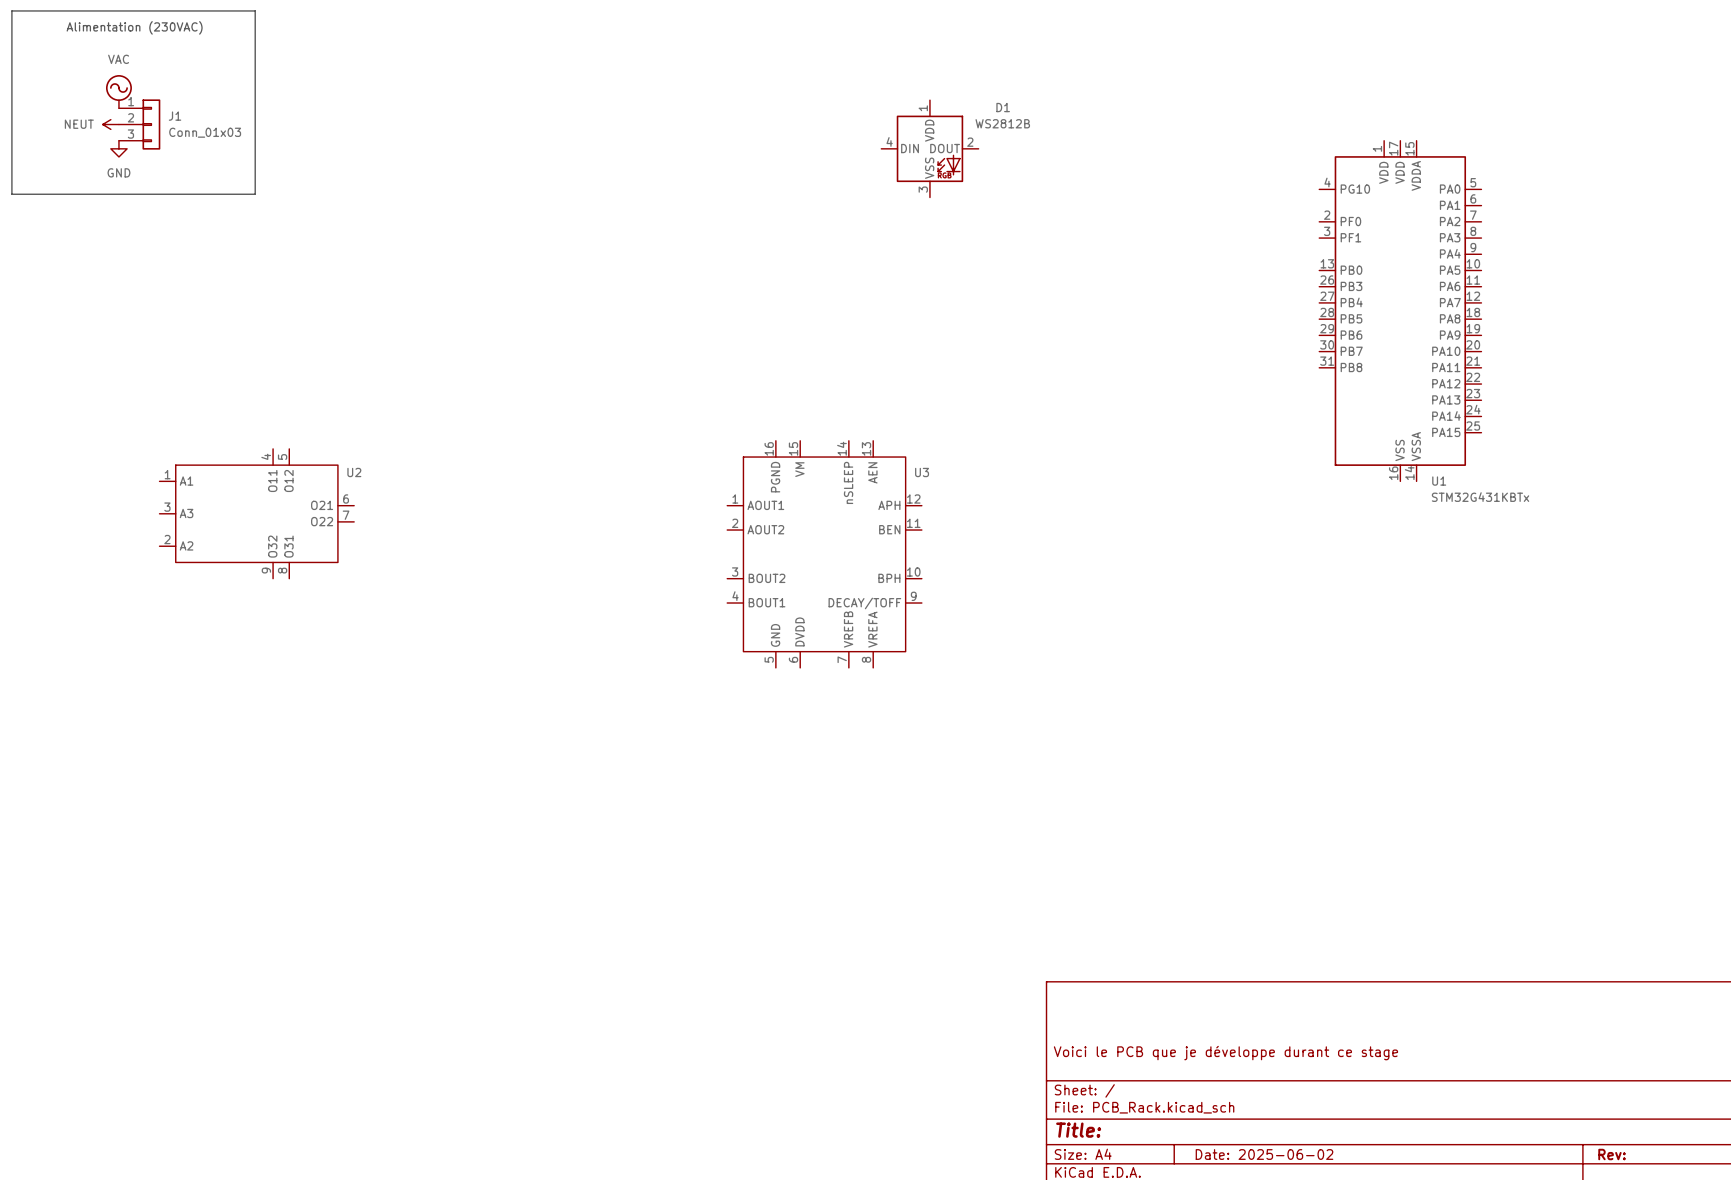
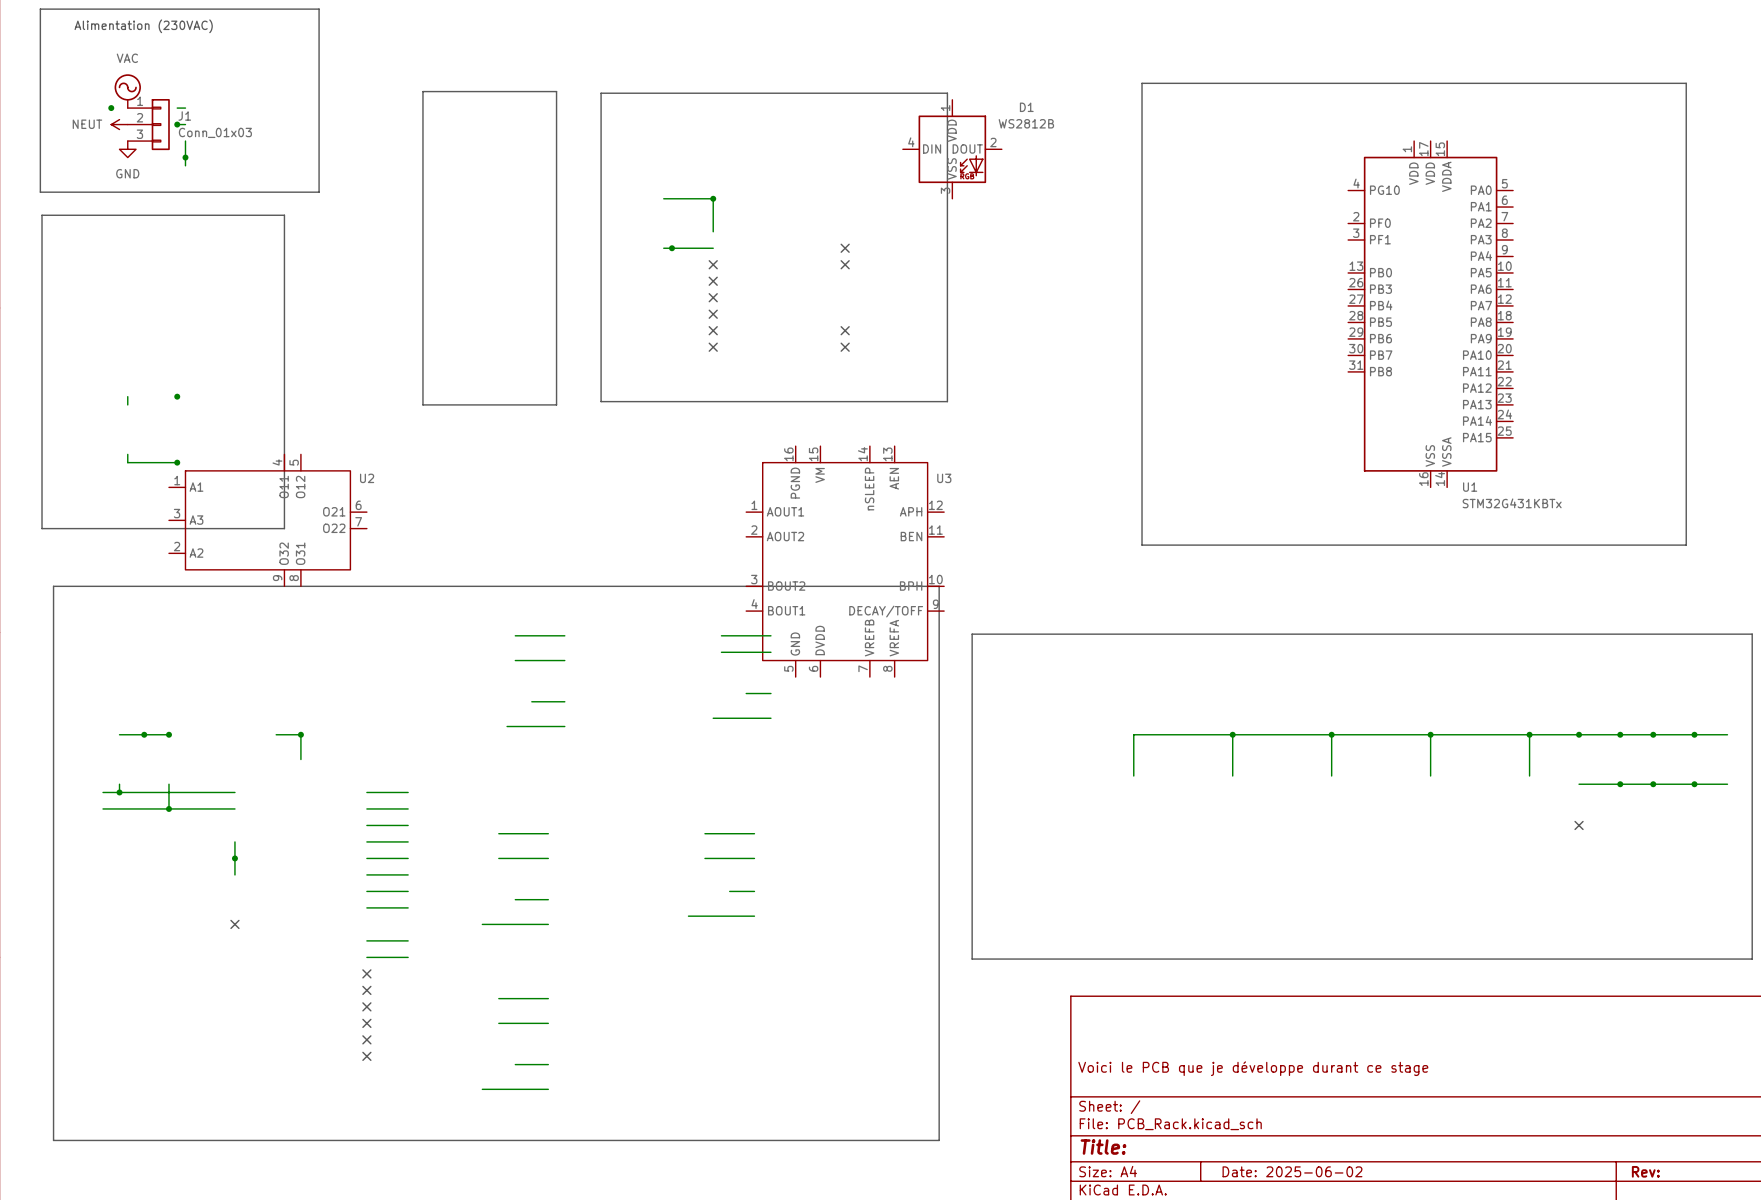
line: (33, 10) (11, 10) (11, 194) (255, 194) (255, 10) -> (40, 9) (40, 192) (319, 192) (319, 9) (266, 9)
line: none -> (1142, 83) (1686, 83) (1686, 545) (1142, 545) (1142, 83)
line: none -> (422, 91) (556, 91) (556, 404) (422, 404) (422, 91)
line: none -> (601, 93) (947, 93) (947, 401) (601, 401) (601, 93)
junction: none -> (111, 108)
wire: none -> (177, 108) (185, 108)
wire: none -> (177, 124) (185, 124)
junction: none -> (177, 124)
wire: none -> (185, 141) (185, 165)
junction: none -> (185, 157)
wire: none -> (663, 198) (713, 198) (713, 231)
junction: none -> (713, 198)
line: none -> (42, 215) (284, 215) (284, 528) (42, 528) (42, 215)
wire: none -> (663, 248) (713, 248)
junction: none -> (671, 248)
no-connect mark: none -> (845, 248)
no-connect mark: none -> (713, 264)
no-connect mark: none -> (845, 264)
no-connect mark: none -> (713, 281)
no-connect mark: none -> (713, 297)
no-connect mark: none -> (713, 314)
no-connect mark: none -> (713, 330)
no-connect mark: none -> (845, 330)
no-connect mark: none -> (713, 347)
no-connect mark: none -> (845, 347)
wire: none -> (127, 396) (127, 404)
junction: none -> (177, 396)
wire: none -> (127, 454) (127, 462) (177, 462)
junction: none -> (177, 462)
line: none -> (53, 586) (939, 586) (939, 1140) (53, 1140) (53, 586)
line: none -> (972, 634) (1752, 634) (1752, 959) (972, 959) (972, 634)
wire: none -> (515, 635) (564, 635)
wire: none -> (721, 635) (770, 635)
wire: none -> (721, 652) (770, 652)
wire: none -> (515, 660) (564, 660)
wire: none -> (746, 693) (770, 693)
wire: none -> (531, 701) (564, 701)
wire: none -> (713, 718) (770, 718)
wire: none -> (507, 726) (564, 726)
wire: none -> (119, 734) (168, 734)
junction: none -> (144, 734)
junction: none -> (168, 734)
wire: none -> (276, 734) (300, 734) (300, 759)
junction: none -> (300, 734)
wire: none -> (1232, 734) (1232, 775)
junction: none -> (1232, 734)
wire: none -> (1331, 734) (1331, 775)
junction: none -> (1331, 734)
wire: none -> (1430, 734) (1430, 775)
junction: none -> (1430, 734)
wire: none -> (1529, 734) (1529, 775)
junction: none -> (1529, 734)
junction: none -> (1579, 734)
junction: none -> (1620, 734)
junction: none -> (1653, 734)
junction: none -> (1694, 734)
wire: none -> (1727, 734) (1133, 734) (1133, 775)
wire: none -> (119, 784) (119, 792)
wire: none -> (168, 784) (168, 808)
wire: none -> (1579, 784) (1727, 784)
junction: none -> (1620, 784)
junction: none -> (1653, 784)
junction: none -> (1694, 784)
wire: none -> (103, 792) (234, 792)
junction: none -> (119, 792)
wire: none -> (366, 792) (408, 792)
wire: none -> (103, 808) (234, 808)
junction: none -> (168, 808)
wire: none -> (366, 808) (408, 808)
wire: none -> (366, 825) (408, 825)
no-connect mark: none -> (1579, 825)
wire: none -> (498, 833) (548, 833)
wire: none -> (704, 833) (754, 833)
wire: none -> (234, 841) (234, 874)
wire: none -> (366, 841) (408, 841)
junction: none -> (234, 858)
wire: none -> (366, 858) (408, 858)
wire: none -> (498, 858) (548, 858)
wire: none -> (704, 858) (754, 858)
wire: none -> (366, 874) (408, 874)
wire: none -> (366, 891) (408, 891)
wire: none -> (729, 891) (754, 891)
wire: none -> (515, 899) (548, 899)
wire: none -> (366, 907) (408, 907)
wire: none -> (688, 916) (754, 916)
no-connect mark: none -> (234, 924)
wire: none -> (482, 924) (548, 924)
wire: none -> (366, 940) (408, 940)
wire: none -> (366, 957) (408, 957)
no-connect mark: none -> (366, 973)
no-connect mark: none -> (366, 990)
wire: none -> (498, 998) (548, 998)
no-connect mark: none -> (366, 1006)
no-connect mark: none -> (366, 1023)
wire: none -> (498, 1023) (548, 1023)
no-connect mark: none -> (366, 1039)
no-connect mark: none -> (366, 1056)
wire: none -> (515, 1064) (548, 1064)
wire: none -> (482, 1089) (548, 1089)

